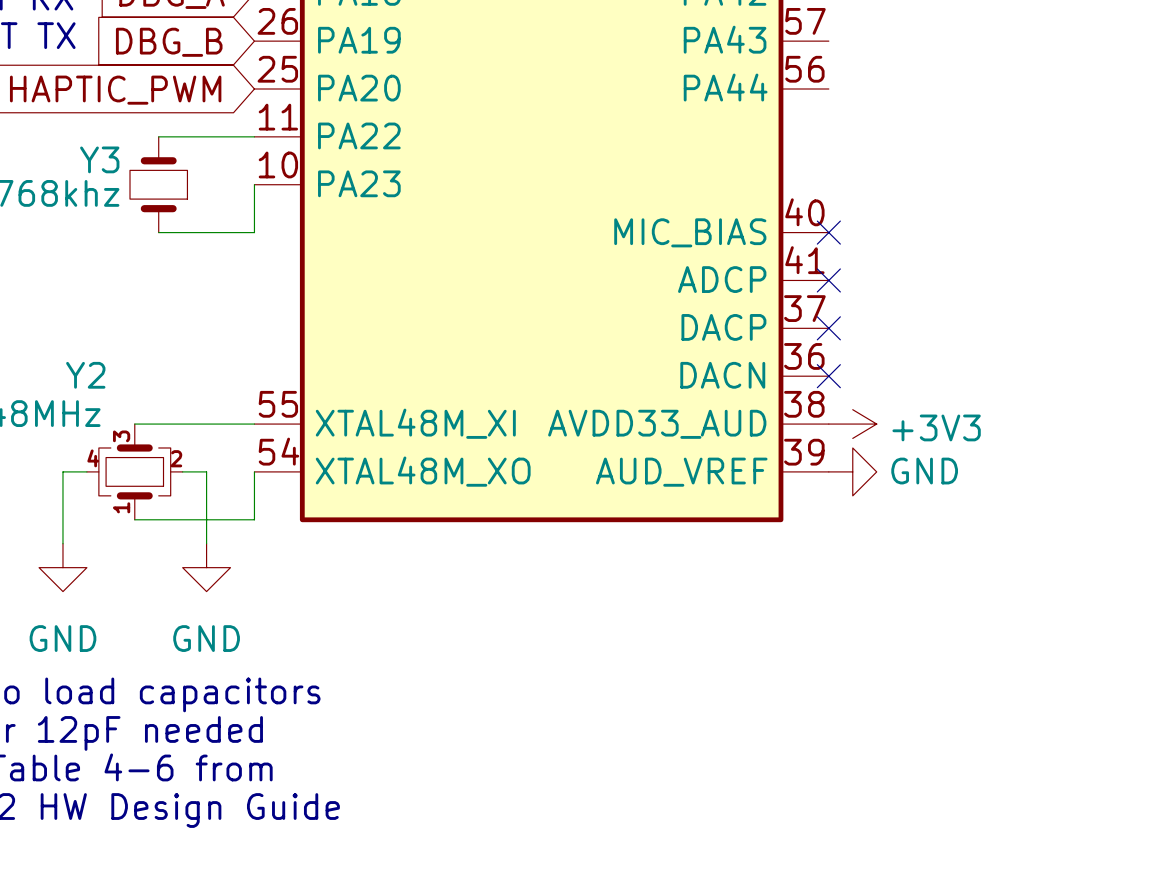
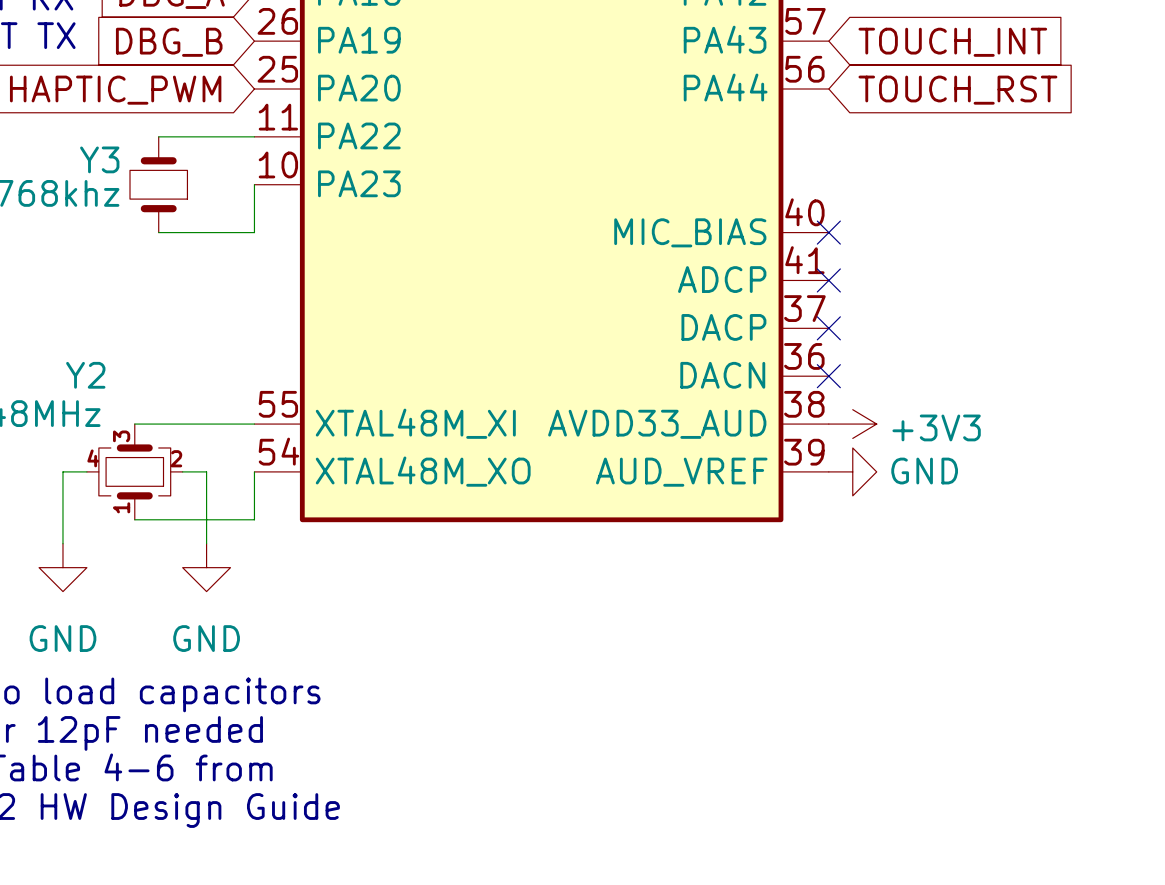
global label: none -> TOUCH_INT (952, 42)
global label: none -> TOUCH_RST (957, 90)

